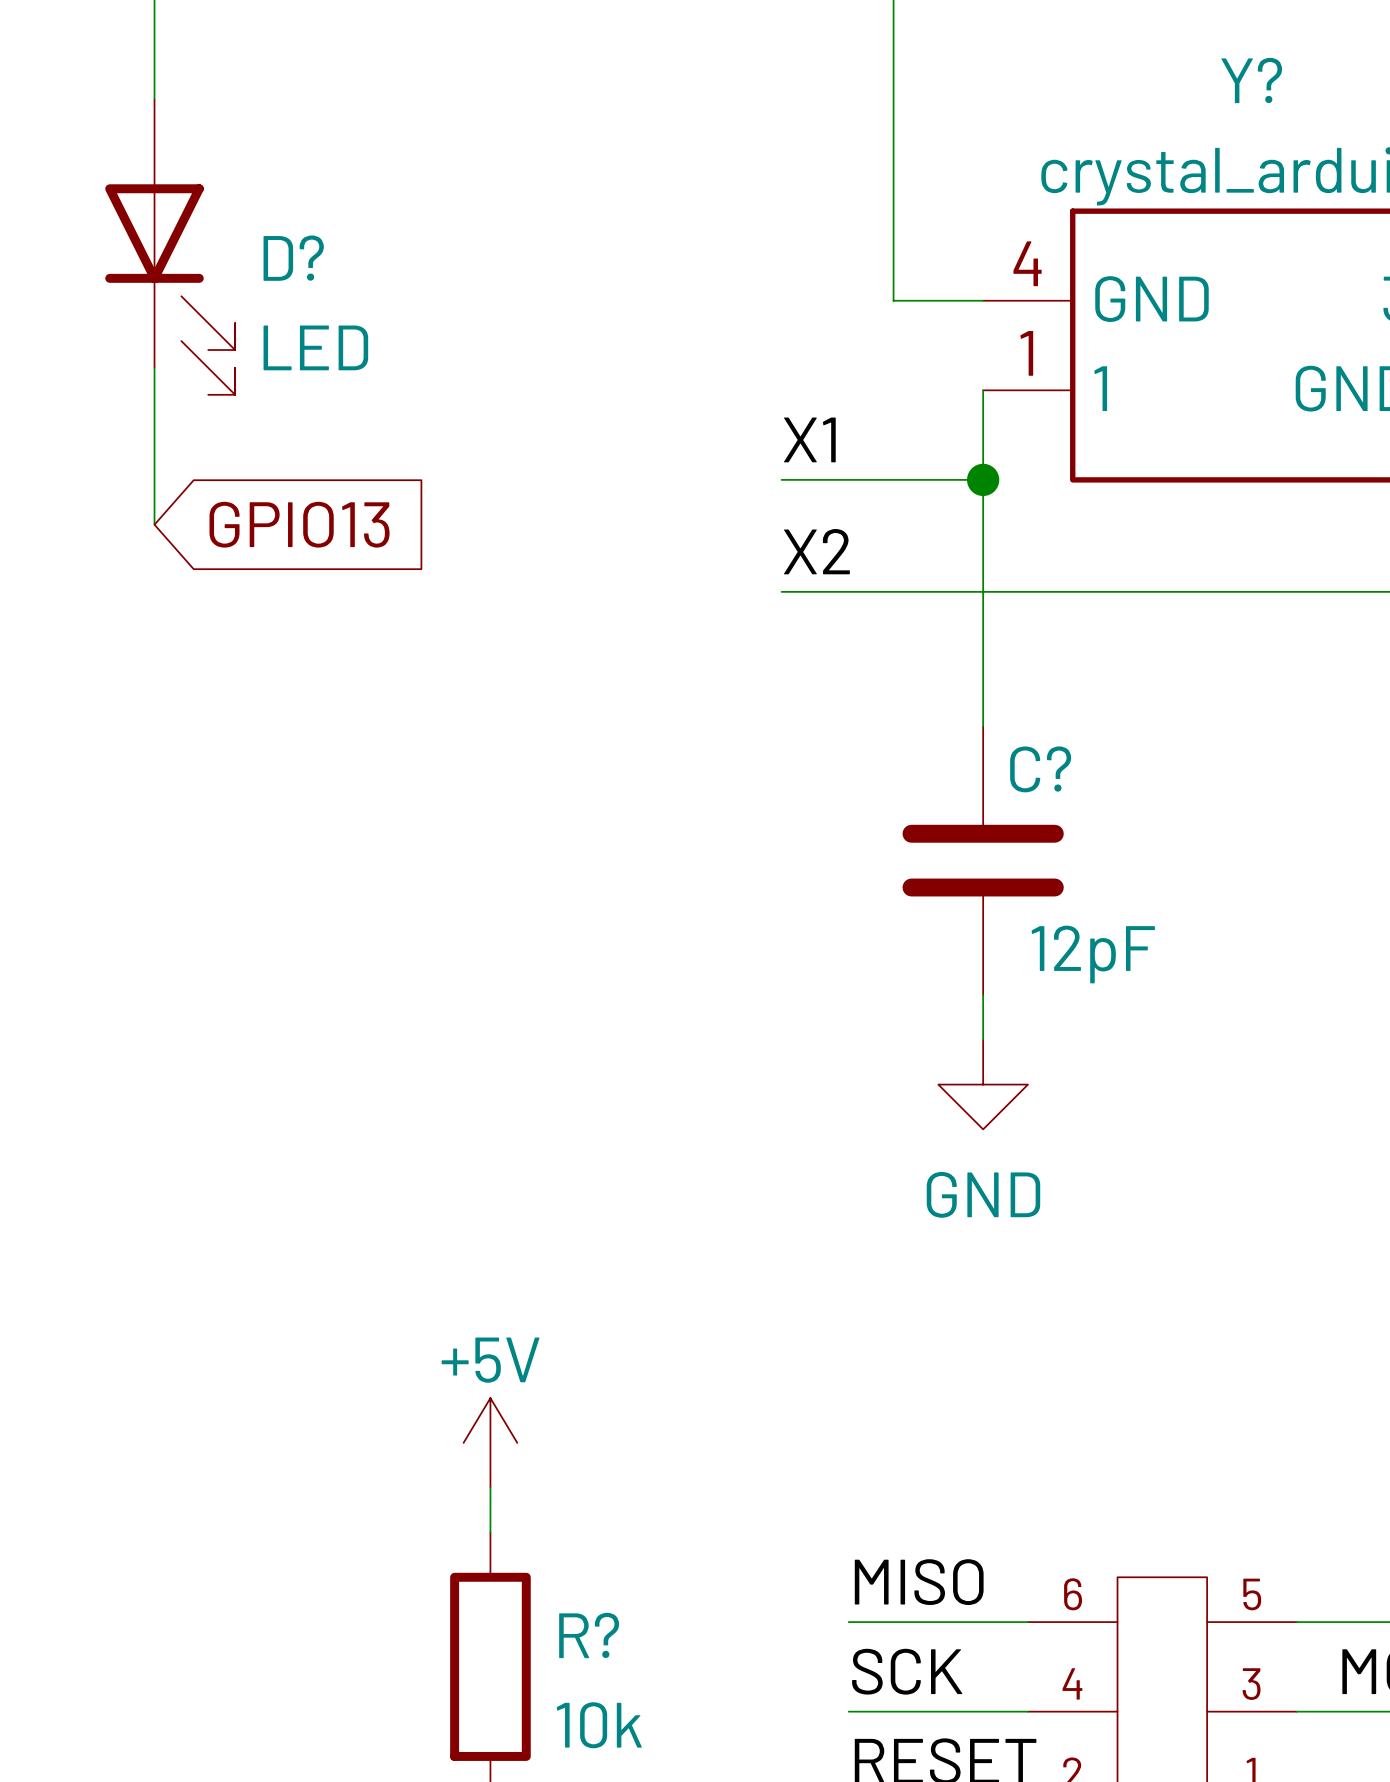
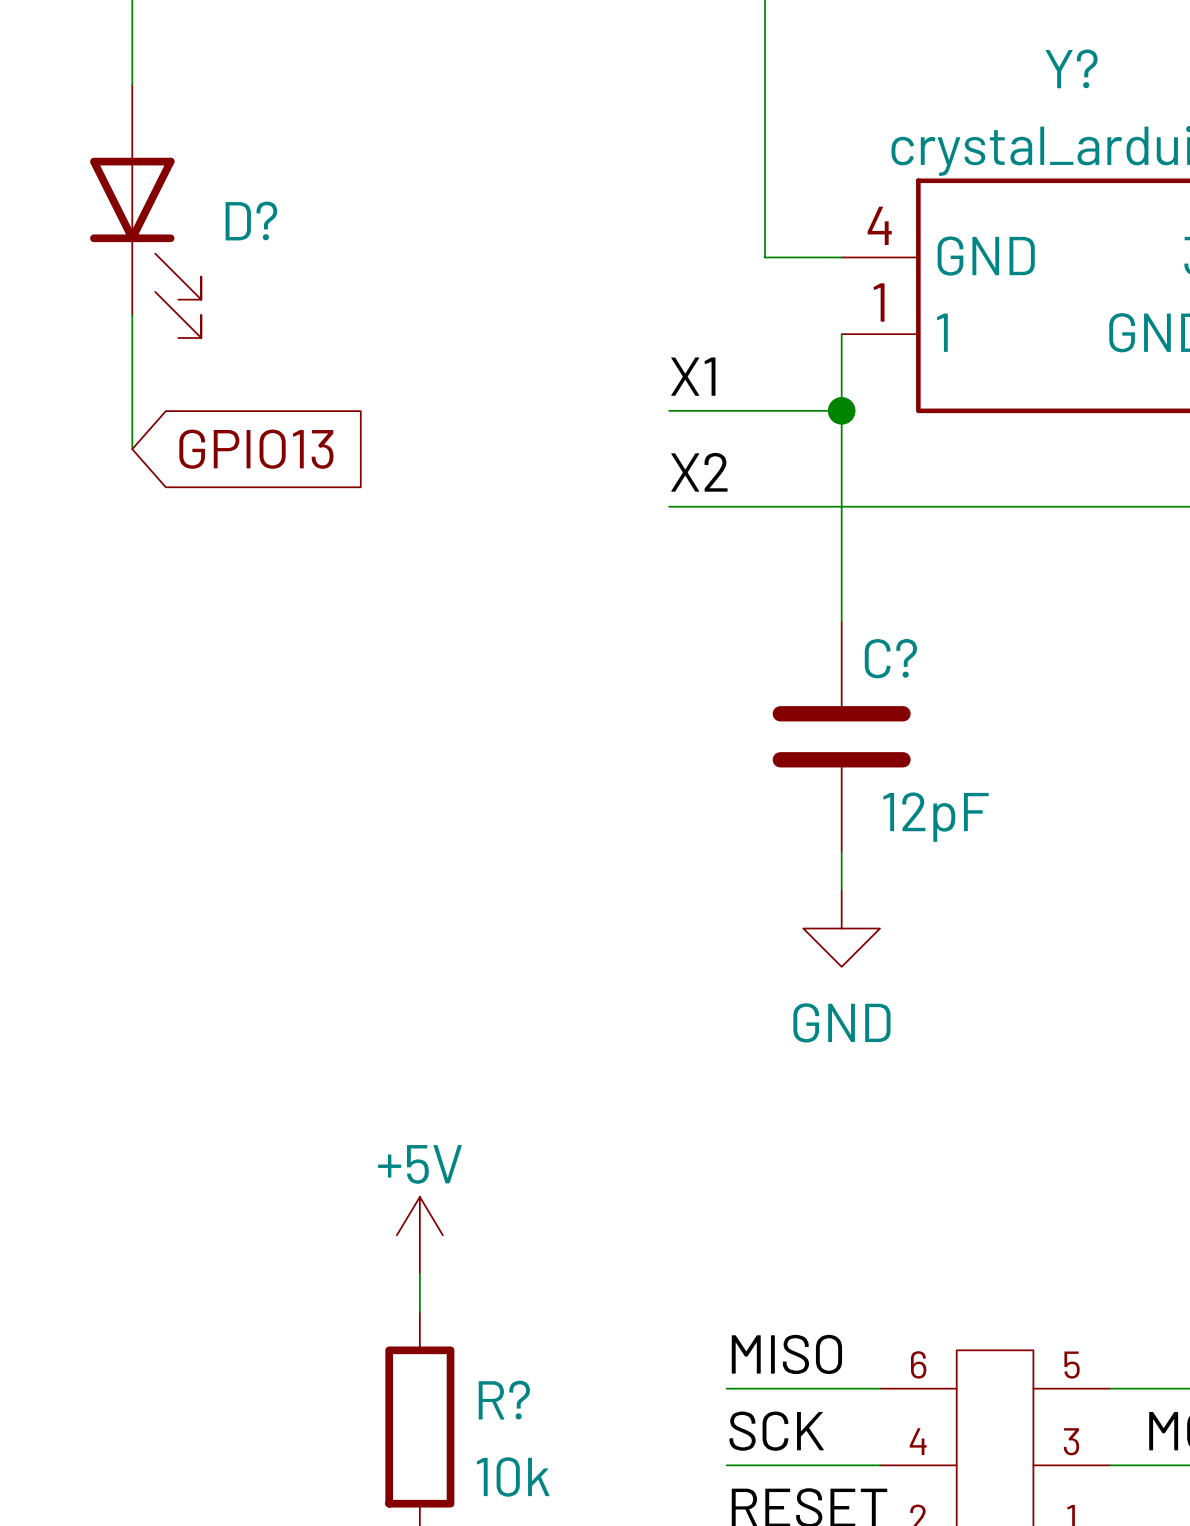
D? value: LED (315, 347) -> none

